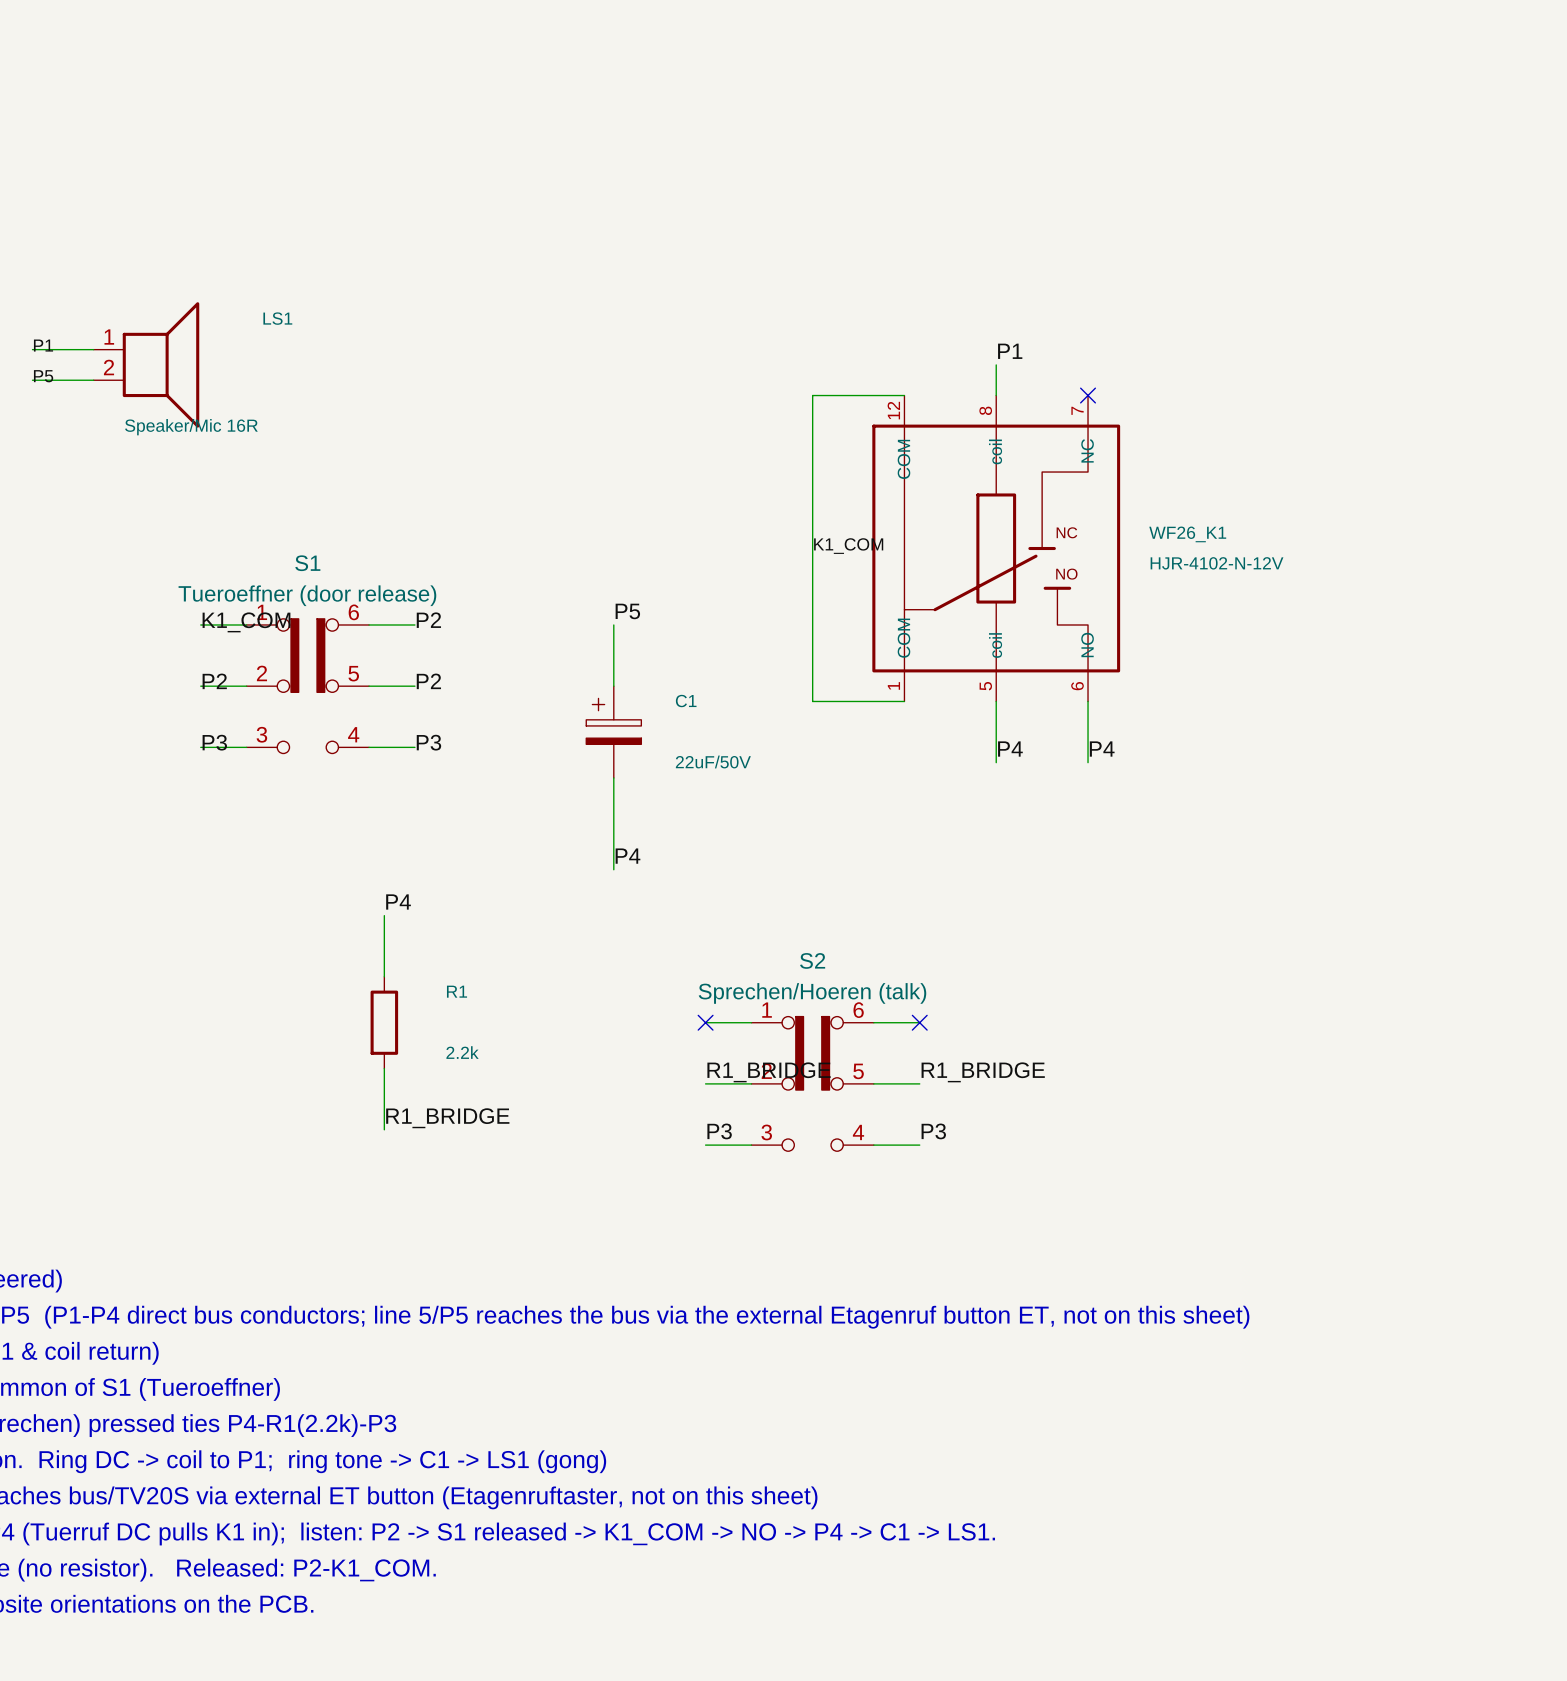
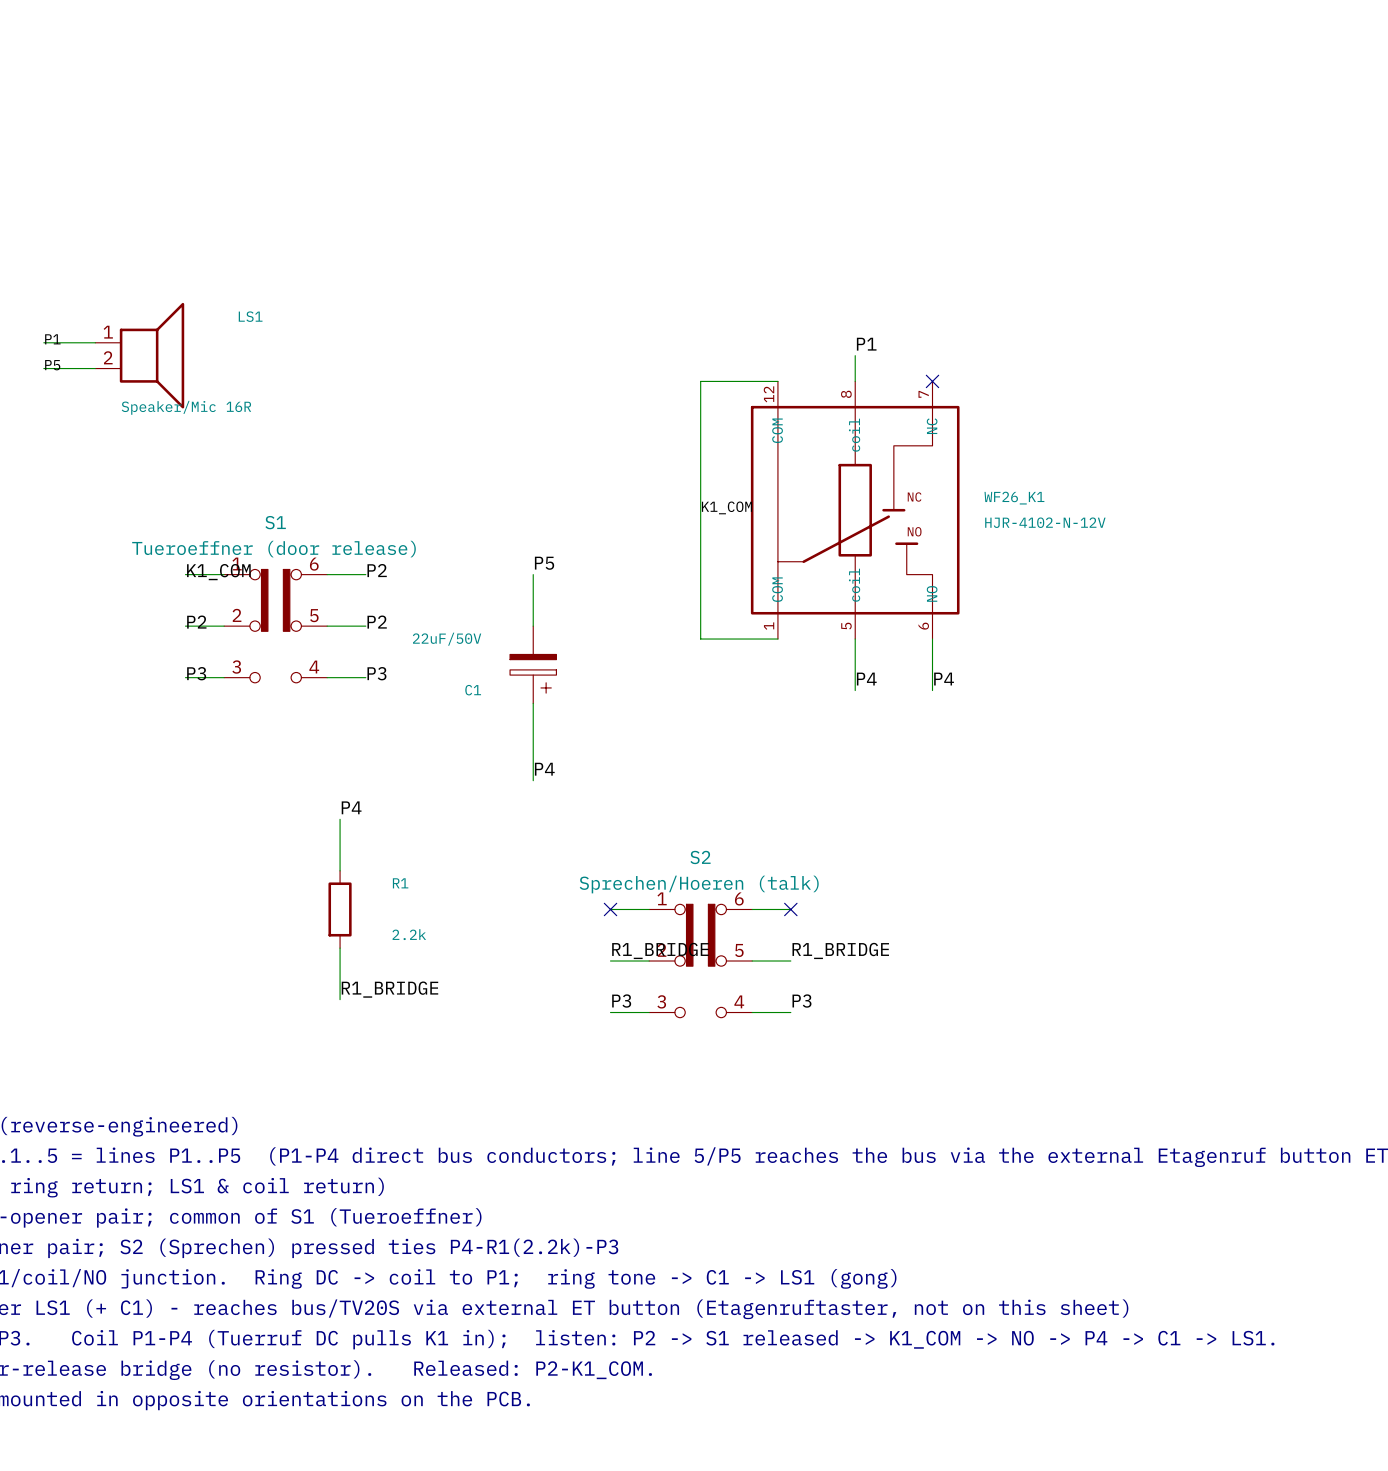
C1 rotation: 0° (613, 721) -> 180° (533, 673)

